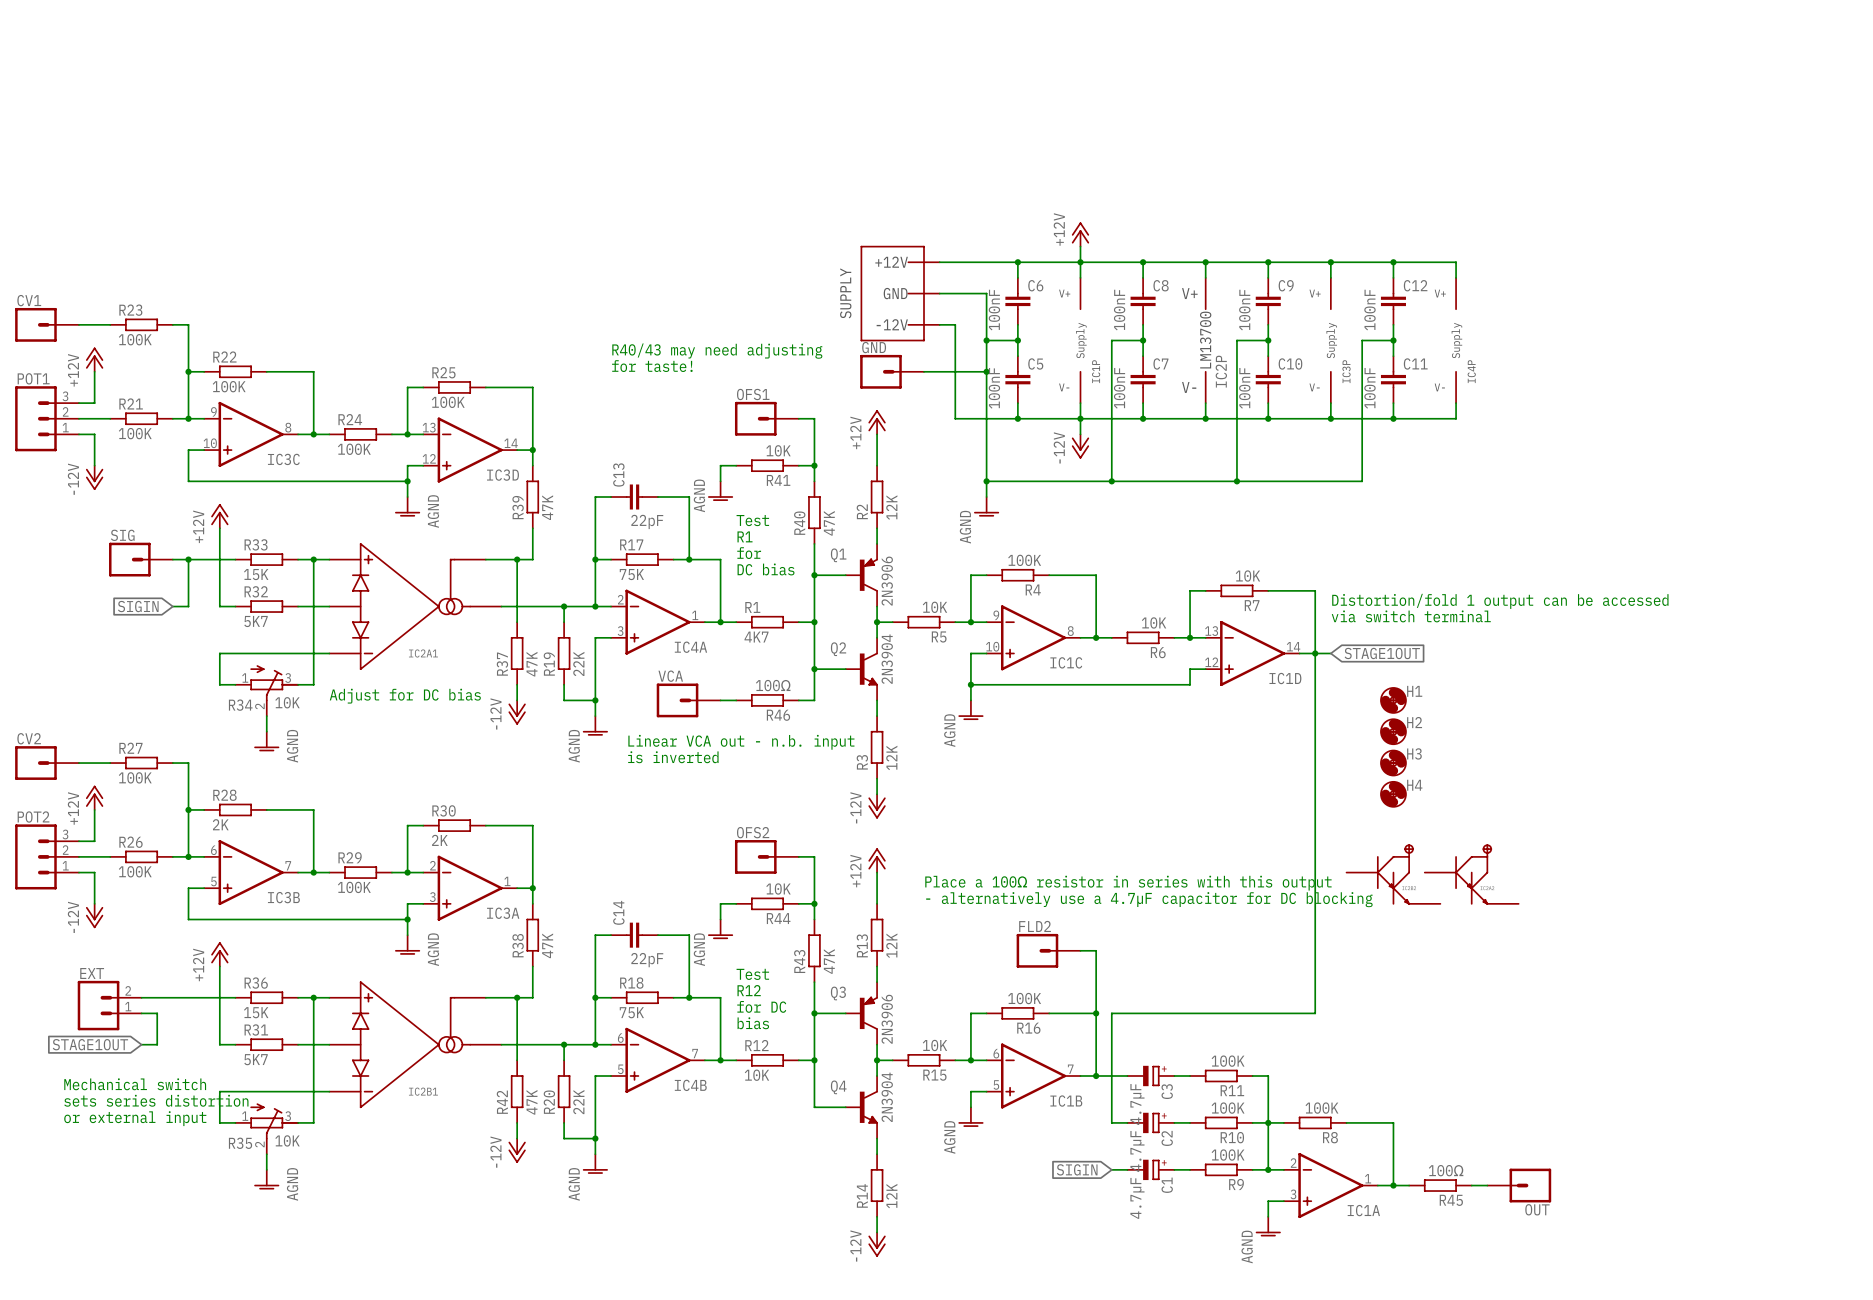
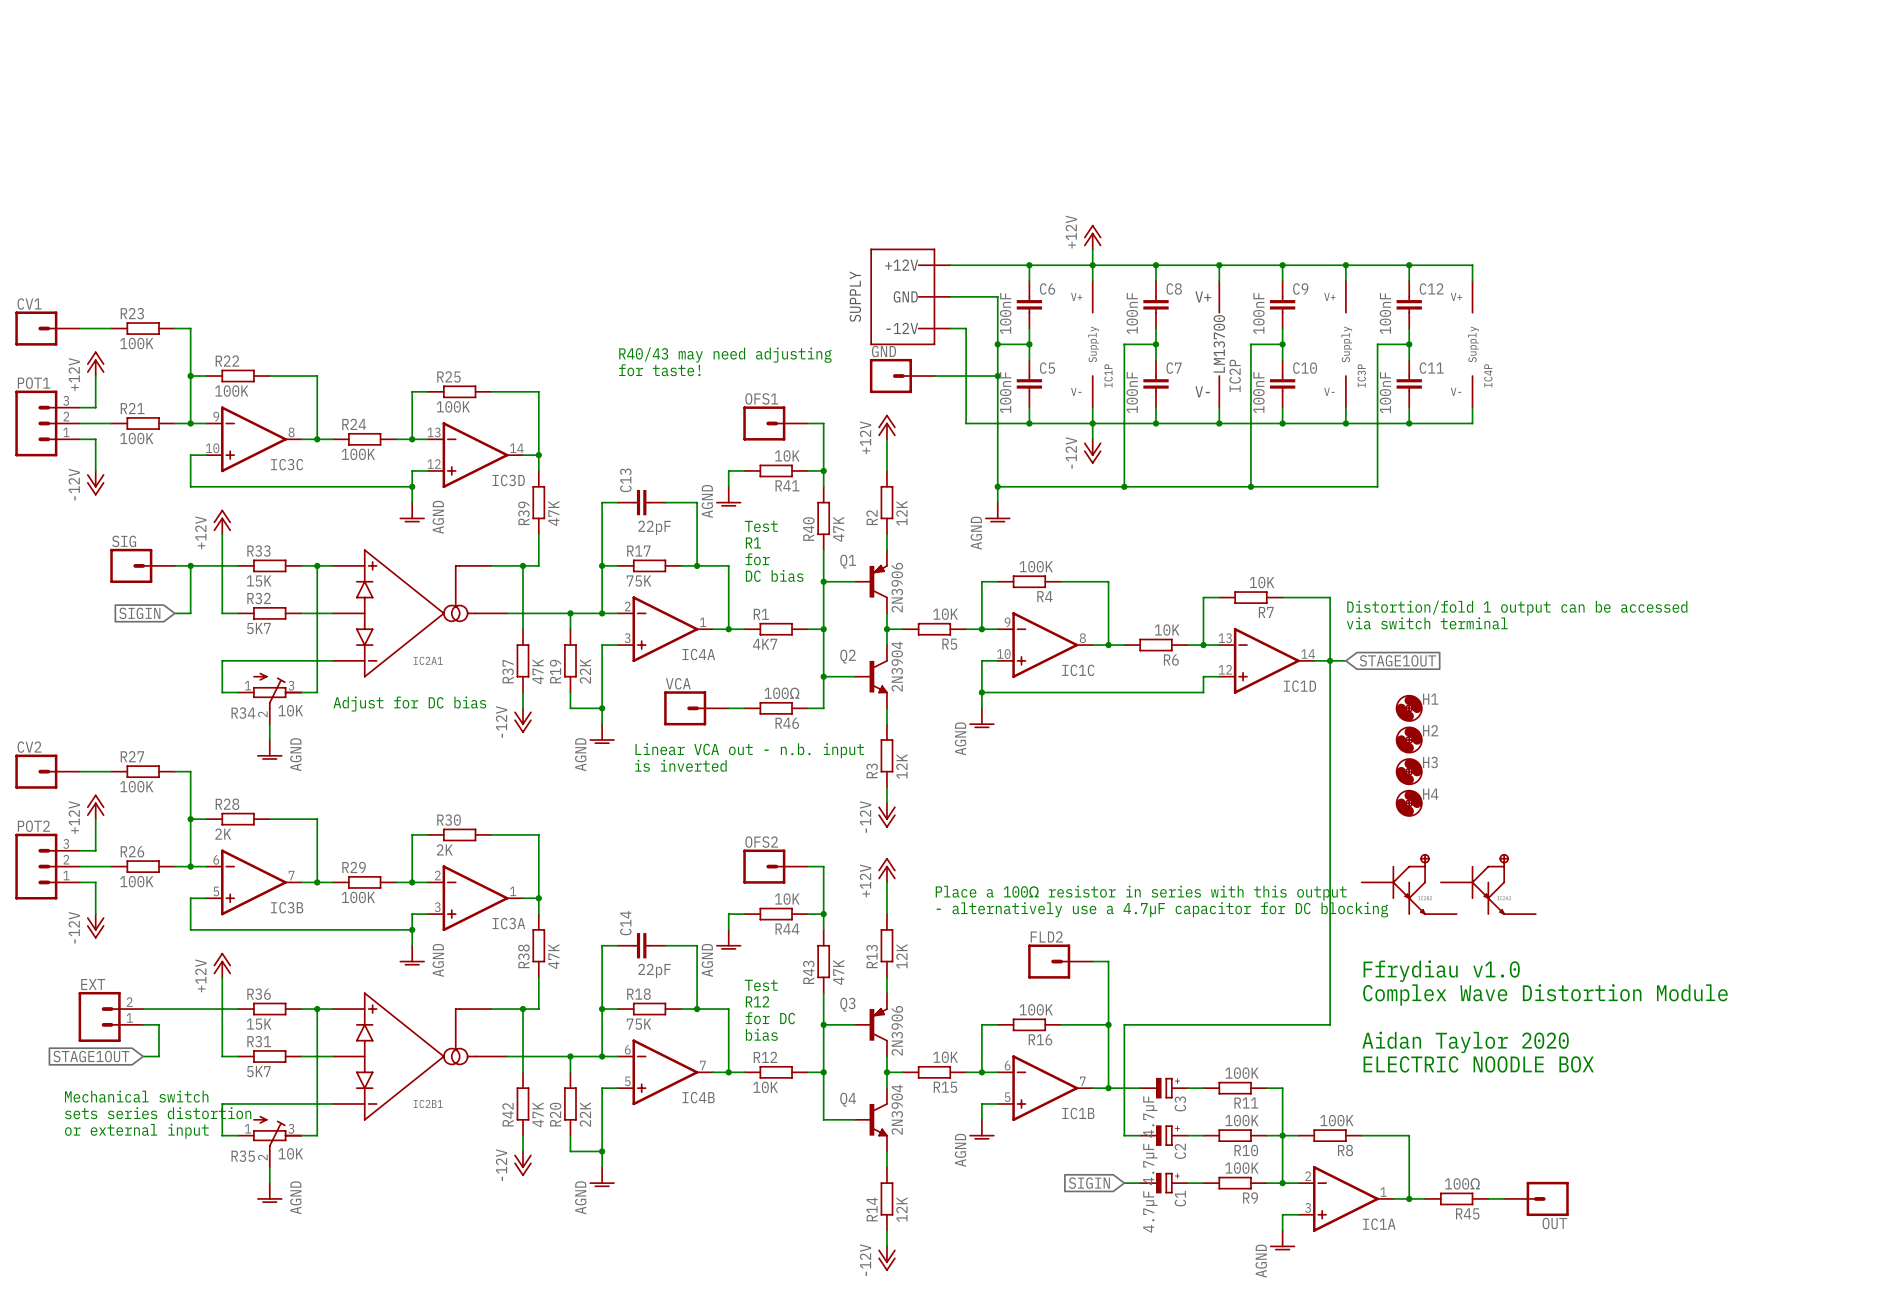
text: none -> Ffrydiau v1.0 (1441, 971)
text: none -> Complex Wave Distortion Module (1545, 994)
text: none -> Aidan Taylor 2020 (1465, 1042)
text: none -> ELECTRIC NOODLE BOX (1478, 1064)

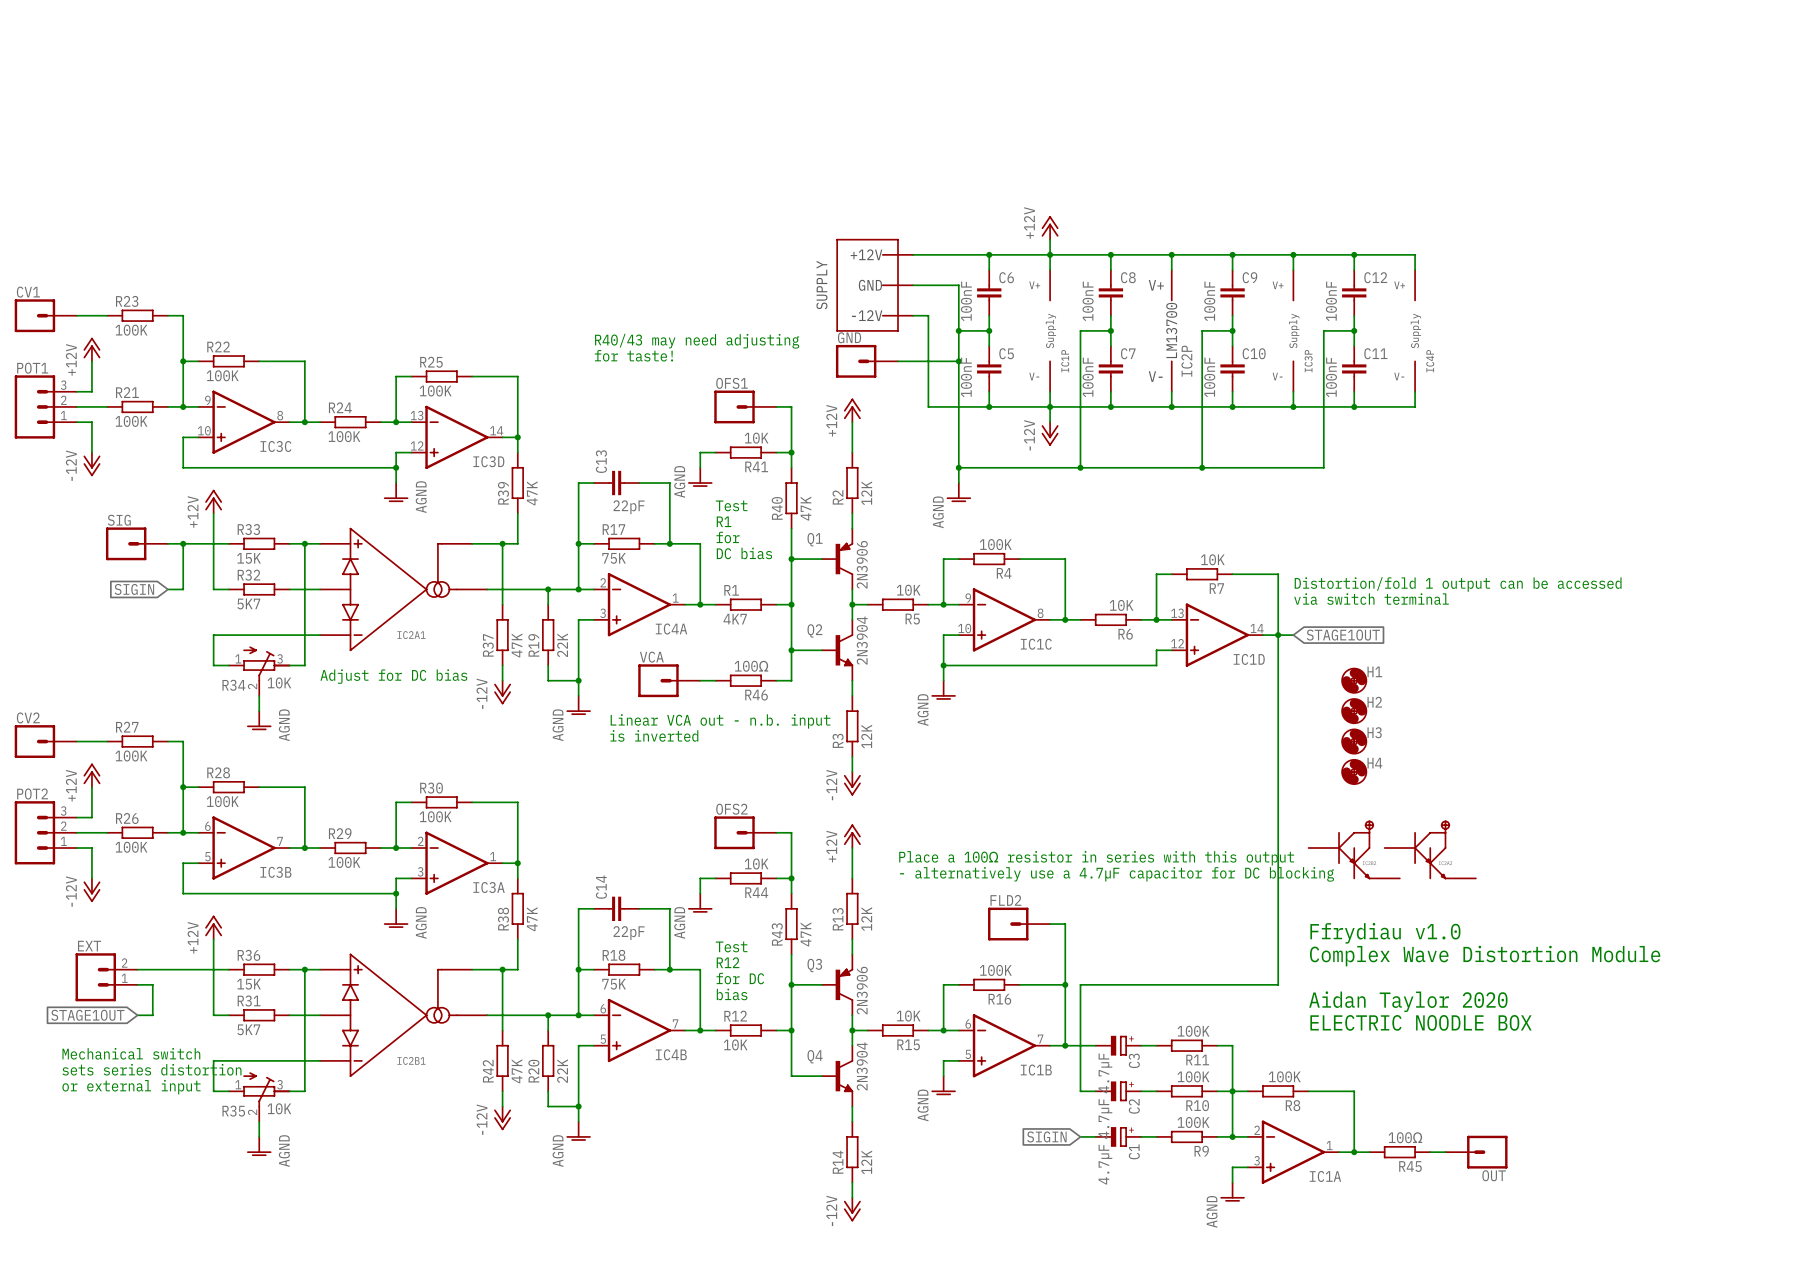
R28 value: 2K (223, 834) -> 100K (222, 801)
R30 value: 2K (444, 849) -> 100K (435, 816)

